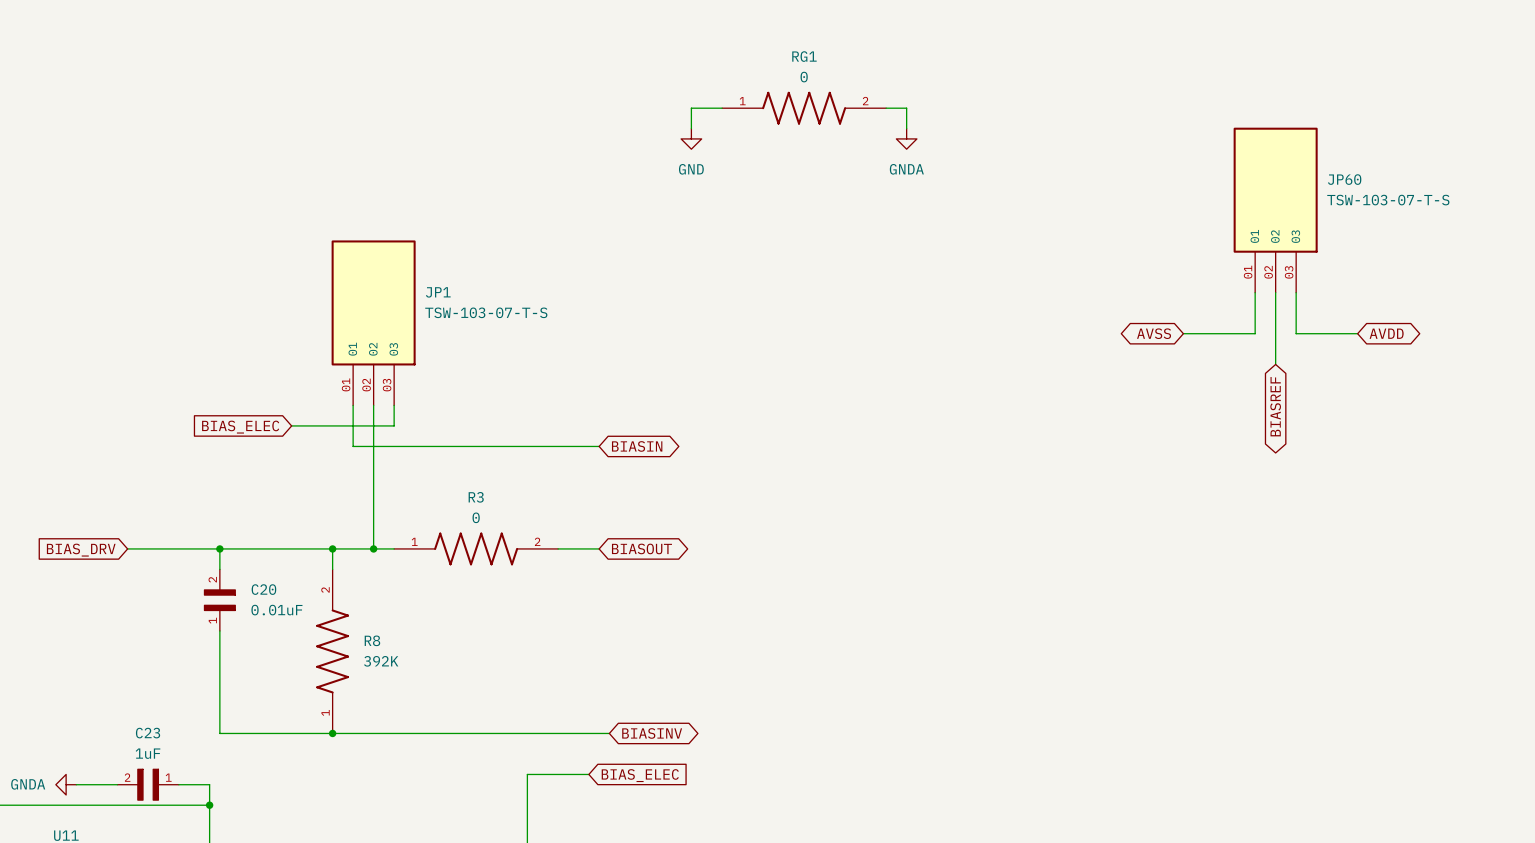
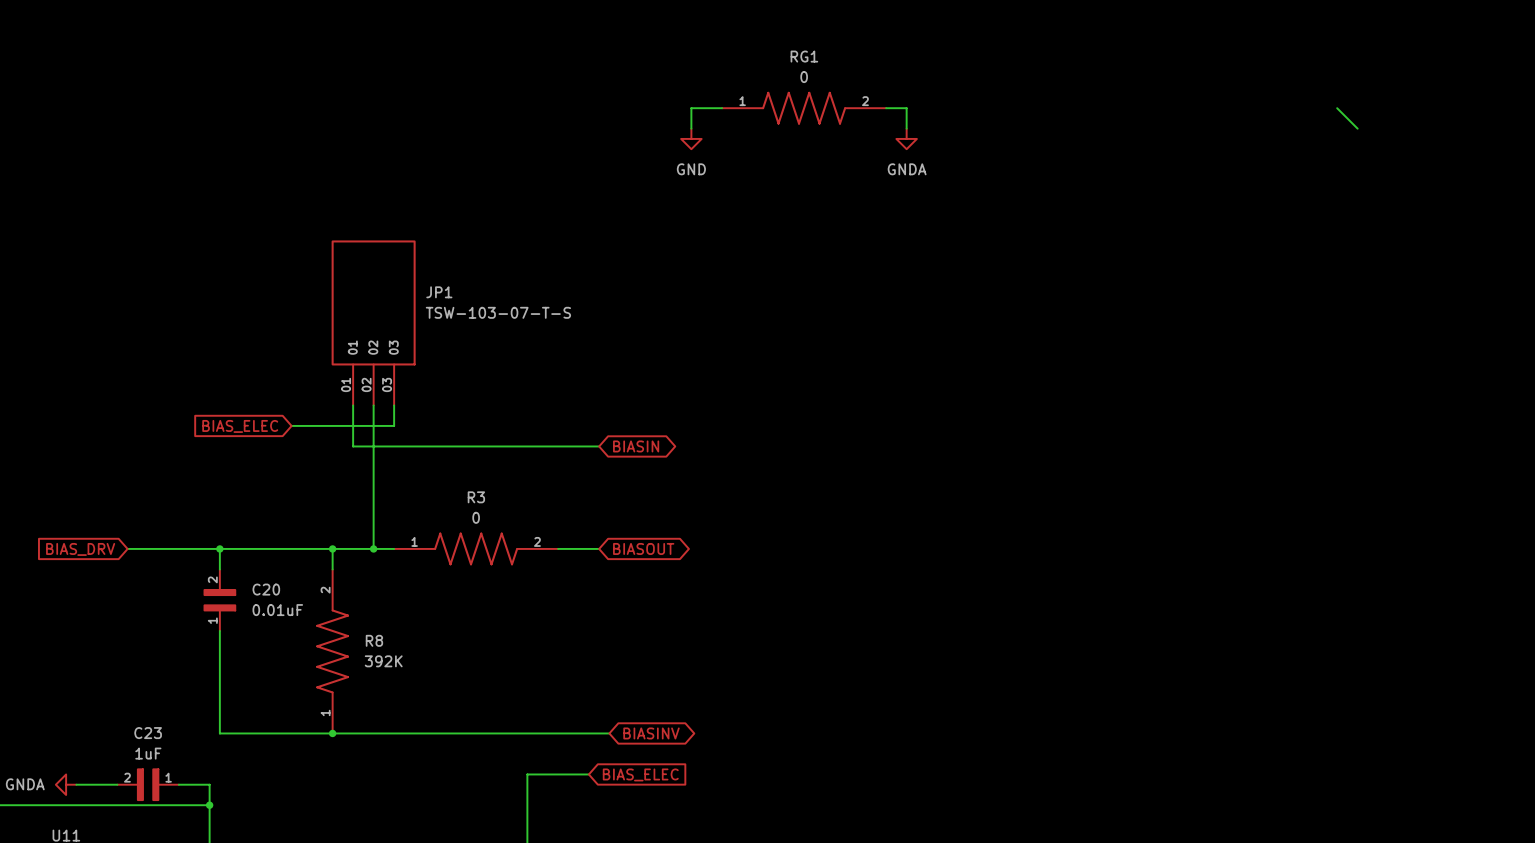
wire: none -> (1337, 108) (1357, 128)
JP60: TSW-103-07-T-S (1275, 210) -> none
wire: (1255, 292) (1255, 333) (1183, 333) -> none
wire: (1275, 292) (1275, 364) -> none
wire: (1296, 292) (1296, 333) (1357, 333) -> none
global label: AVSS (1154, 333) -> none
global label: AVDD (1386, 333) -> none
global label: BIASREF (1275, 406) -> none

